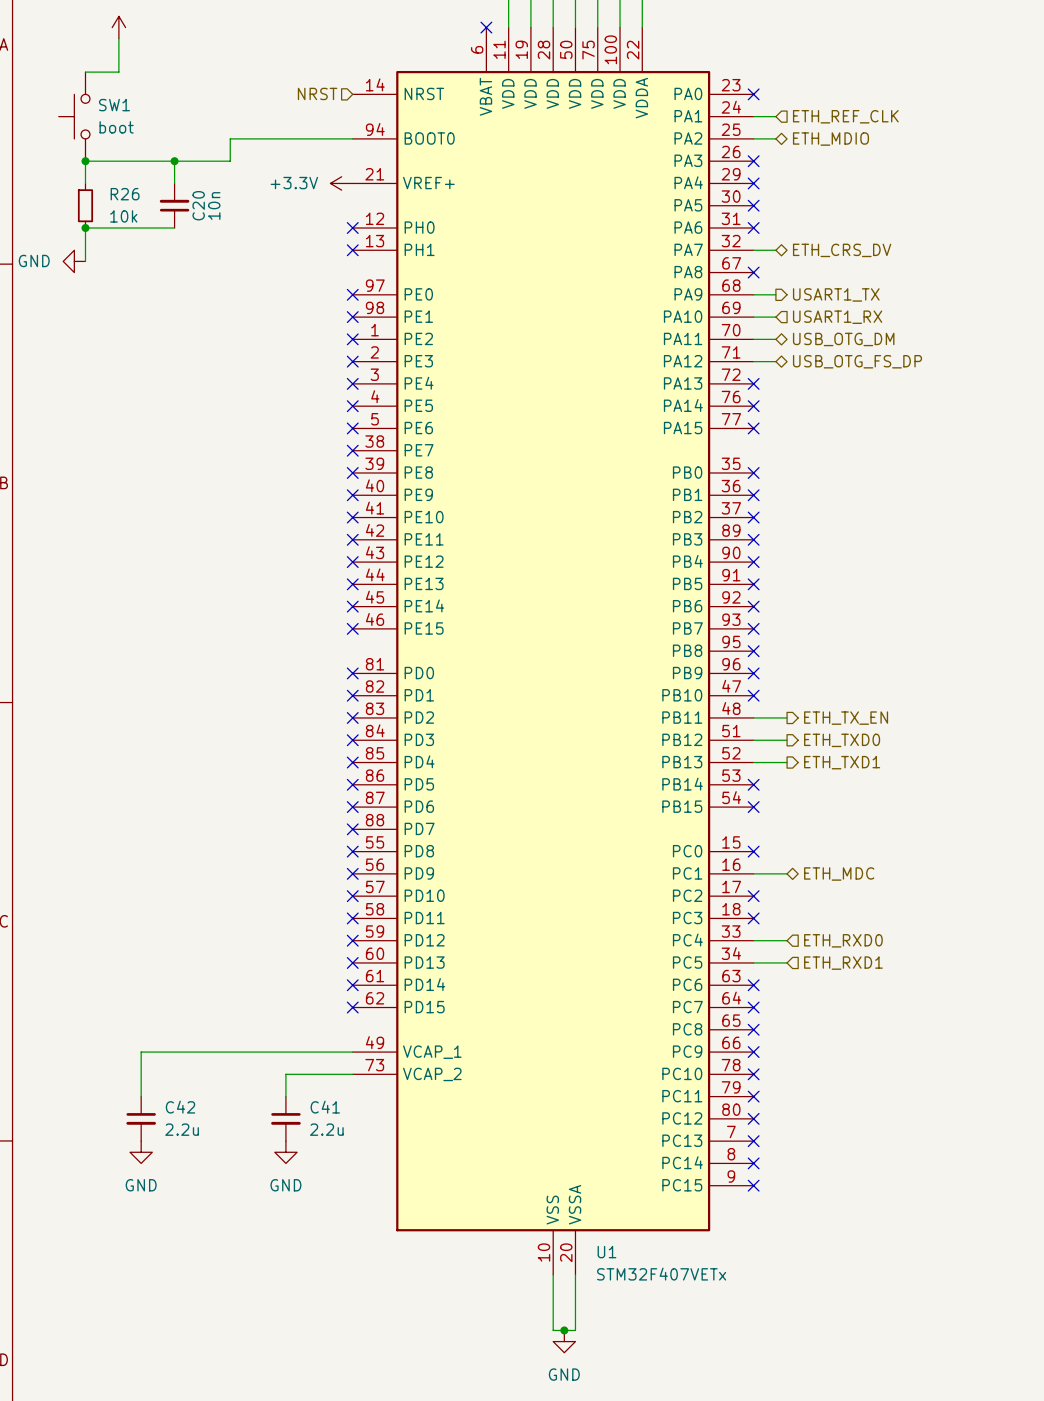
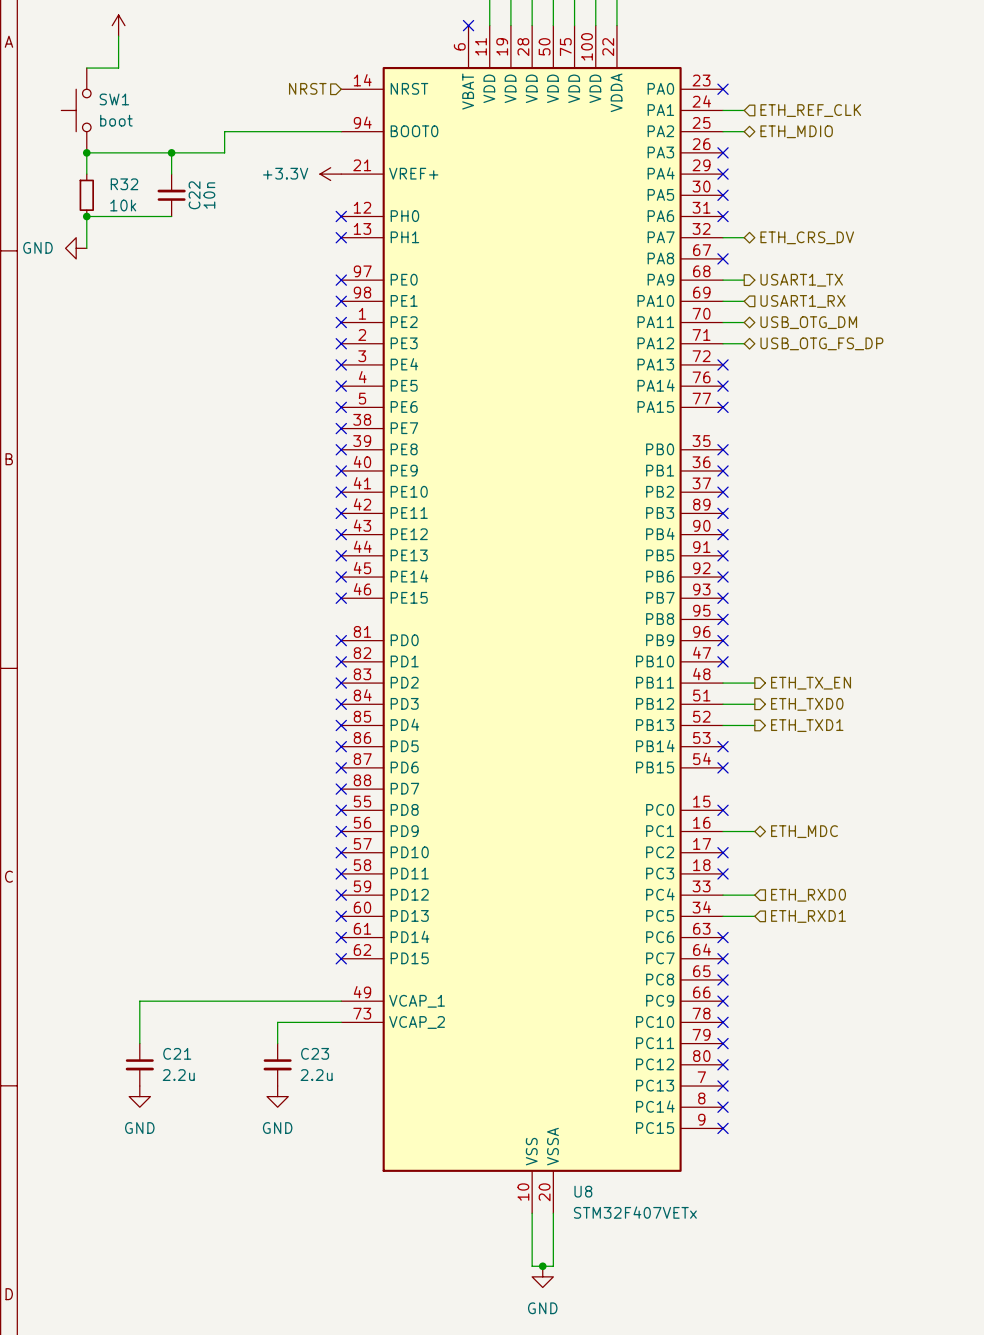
R26 name: R26 (125, 194) -> R32 (124, 184)
C20 name: C20 (198, 205) -> C22 (194, 195)
C42 name: C42 (180, 1107) -> C21 (177, 1053)
C41 name: C41 (325, 1107) -> C23 (315, 1053)
U1 name: U1 (606, 1252) -> U8 (583, 1191)

